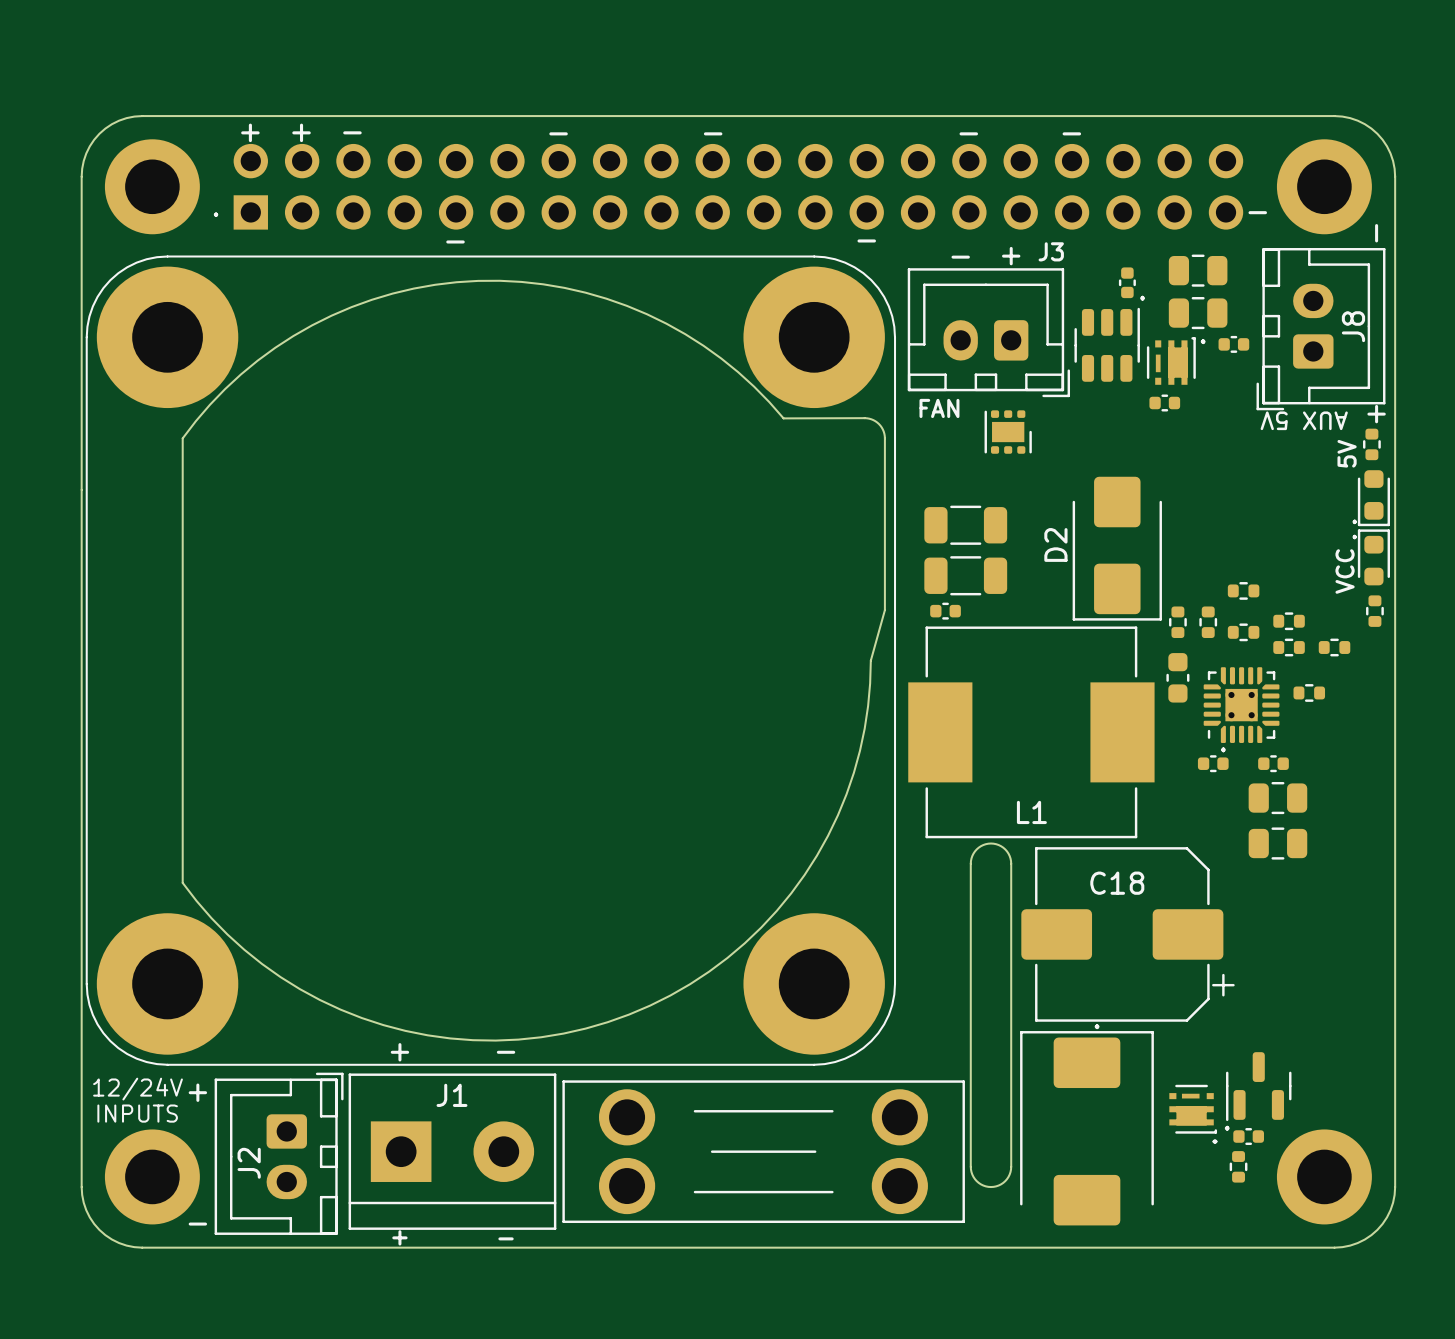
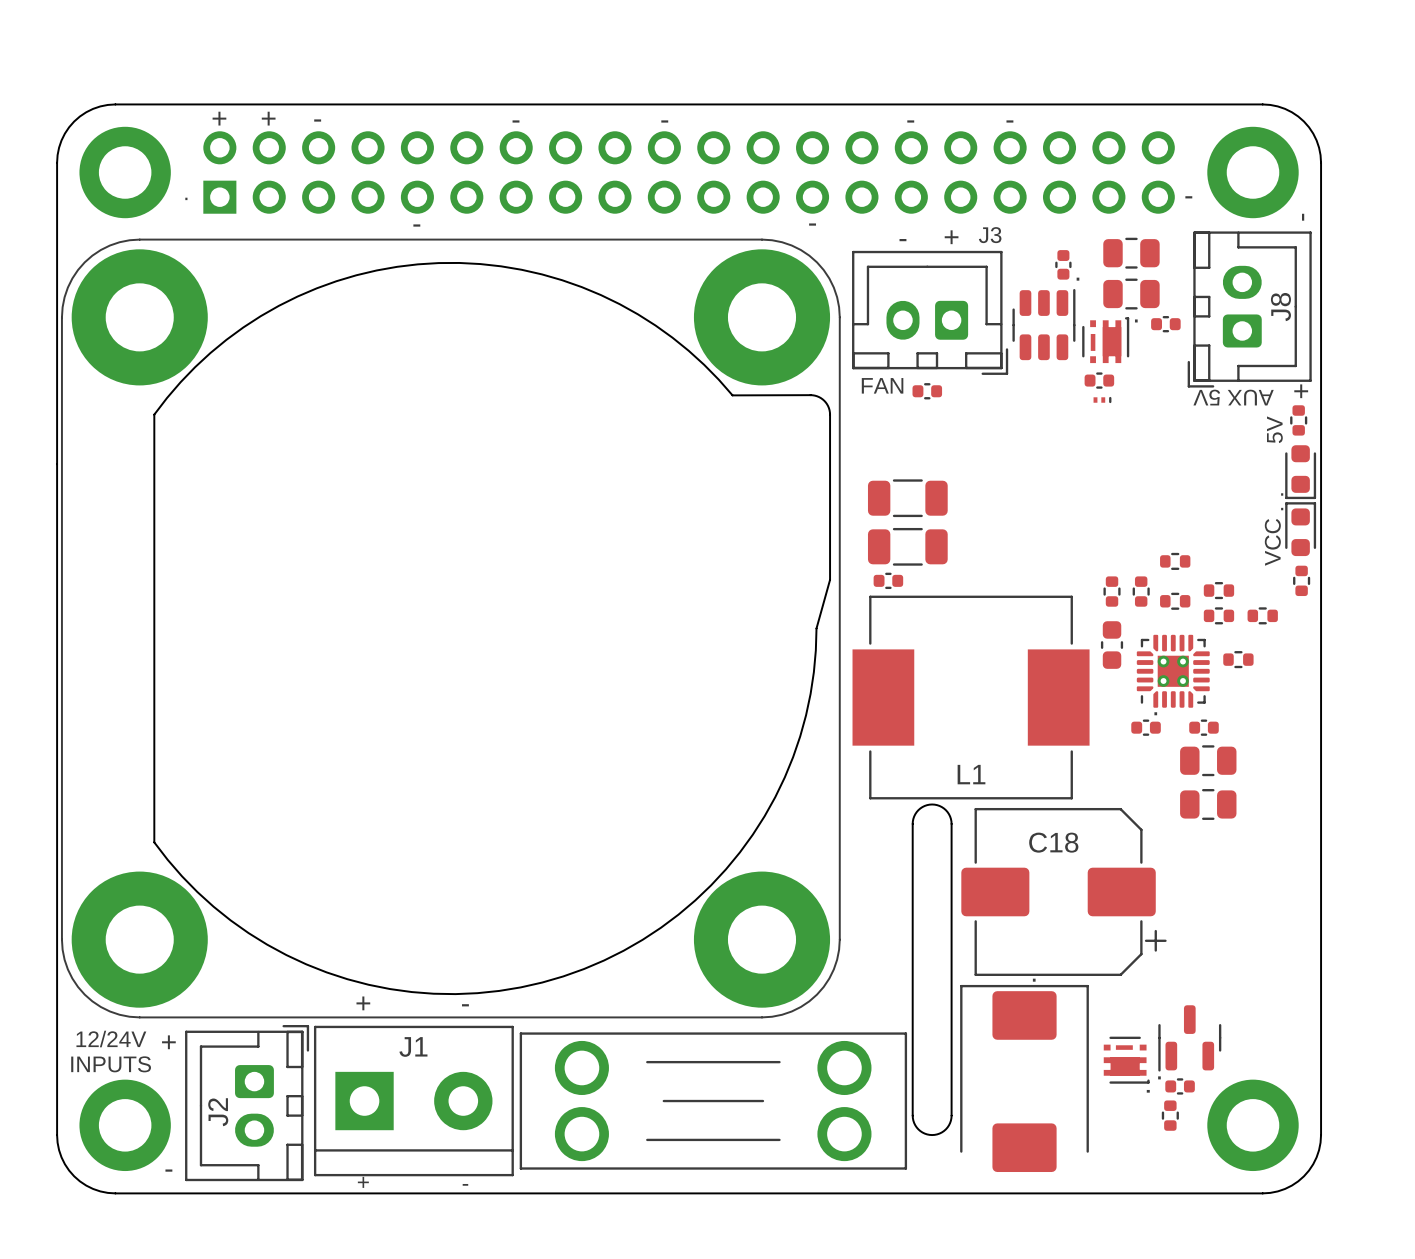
part: none -> (927, 391)
part: none -> (1102, 400)
part: (1008, 432) -> none
D2: (1117, 548) -> none

